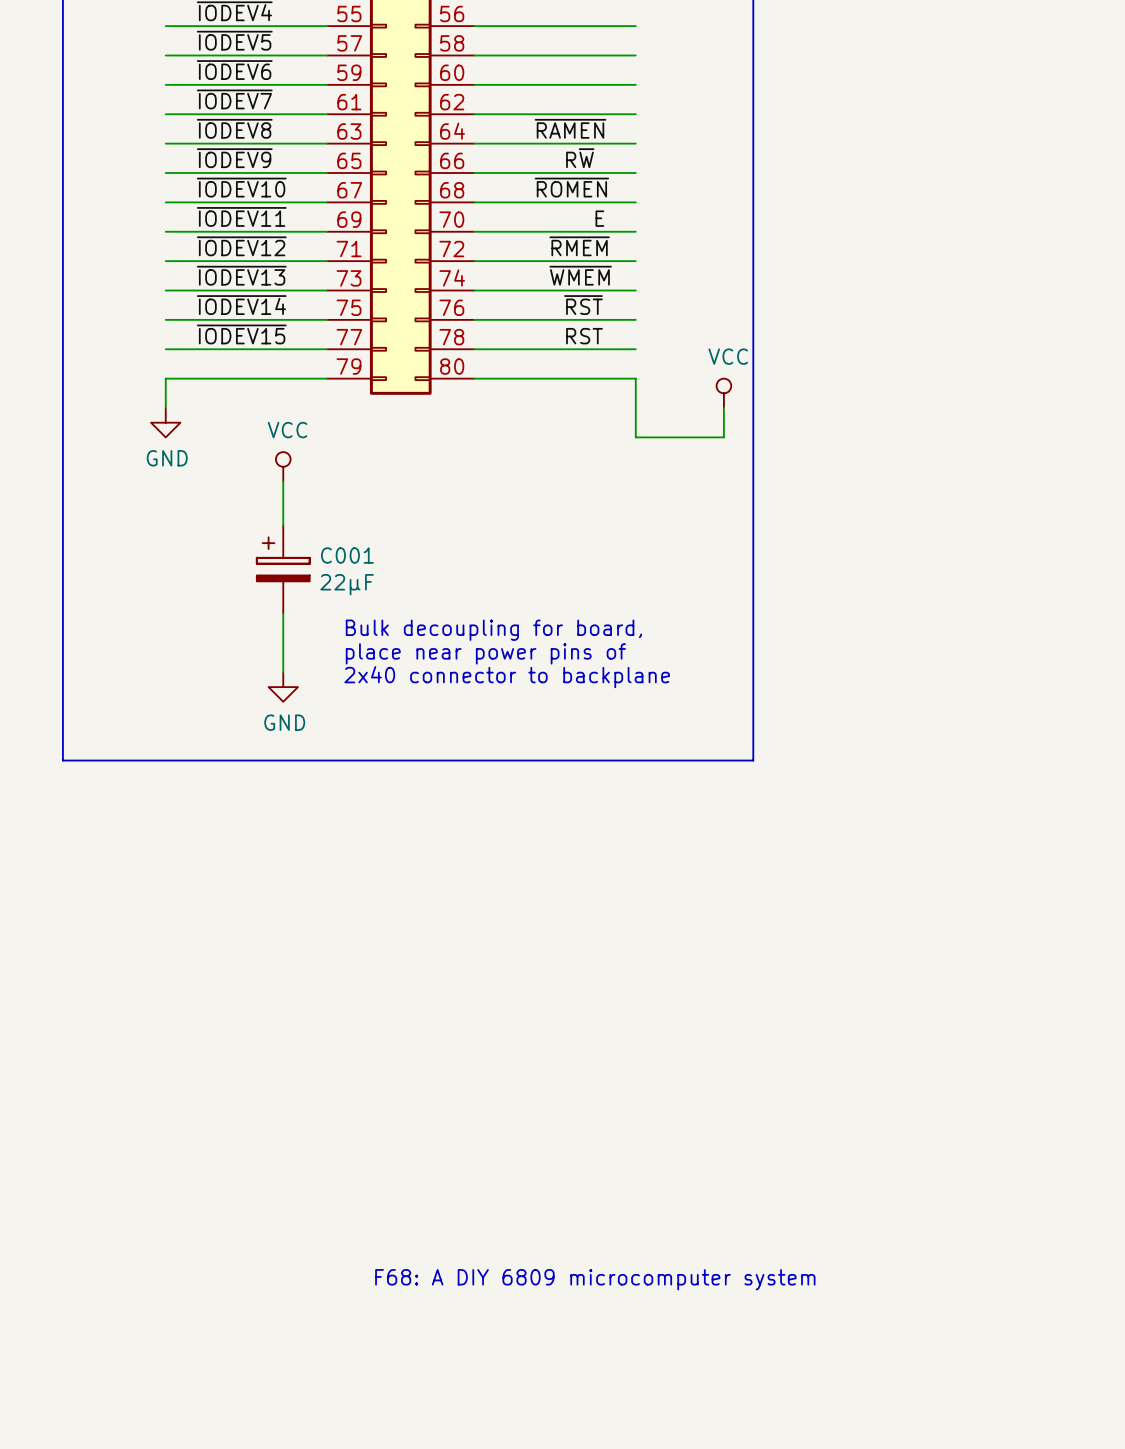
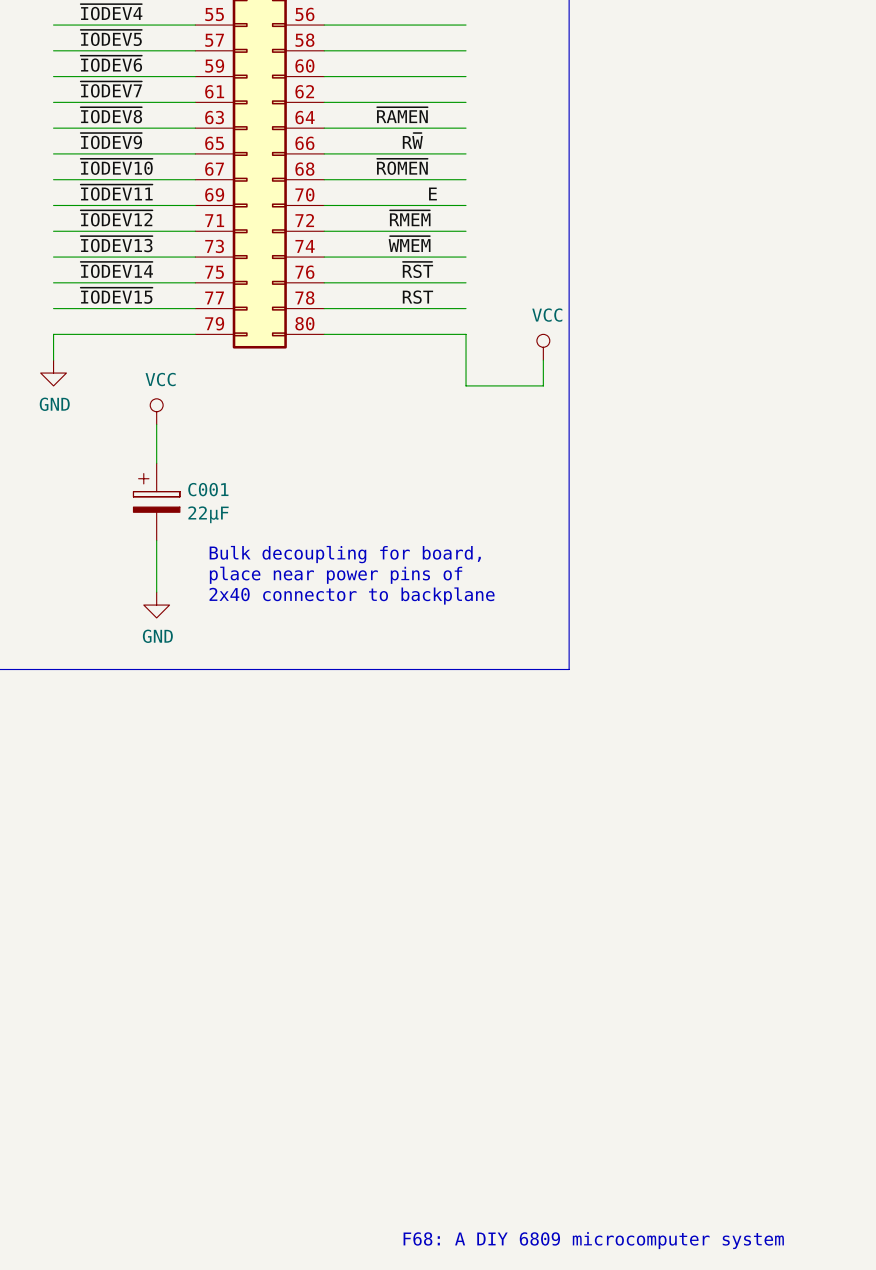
text position: F68: A DIY 6809 microcomputer system (595, 1279) -> F68: A DIY 6809 microcomputer system (593, 1240)

